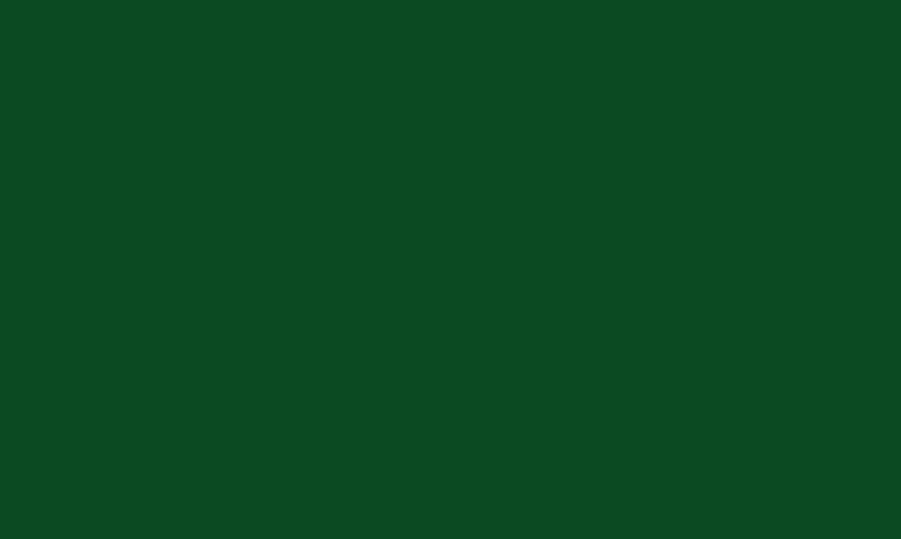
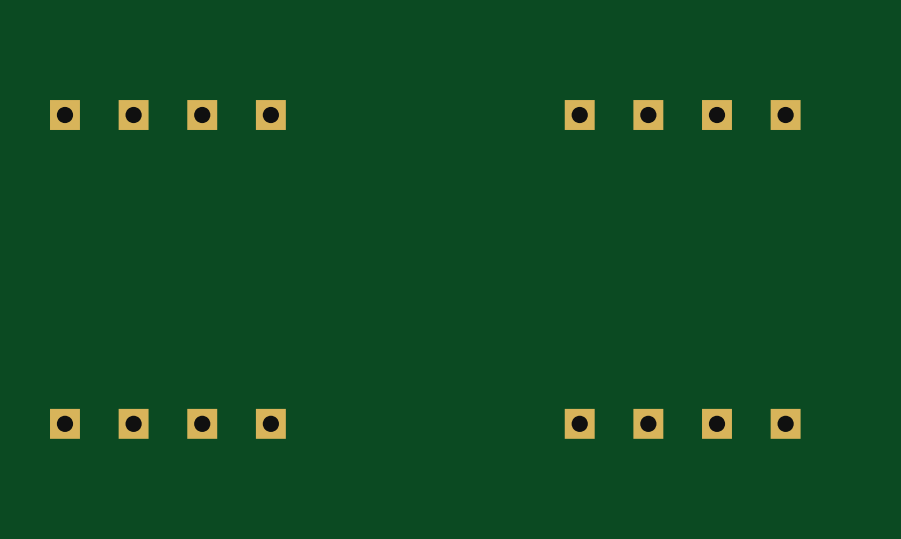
part: none -> (167, 115)
part: none -> (682, 115)
part: none -> (167, 423)
part: none -> (682, 423)

